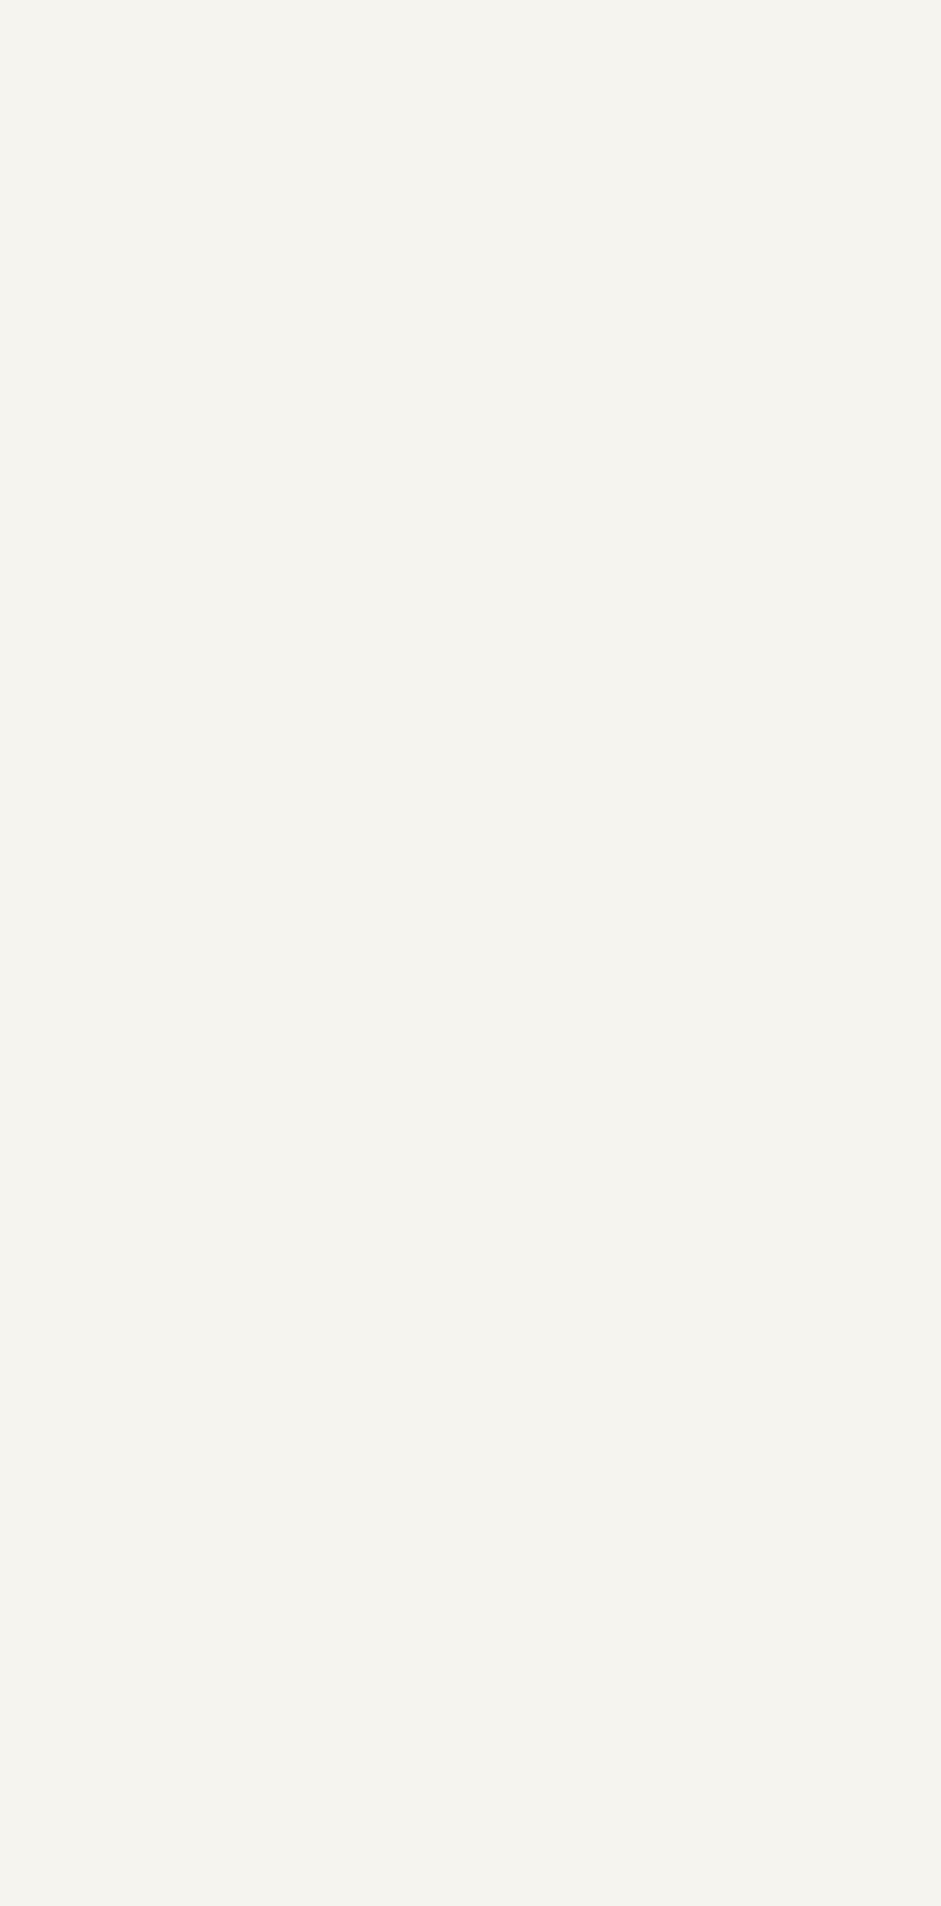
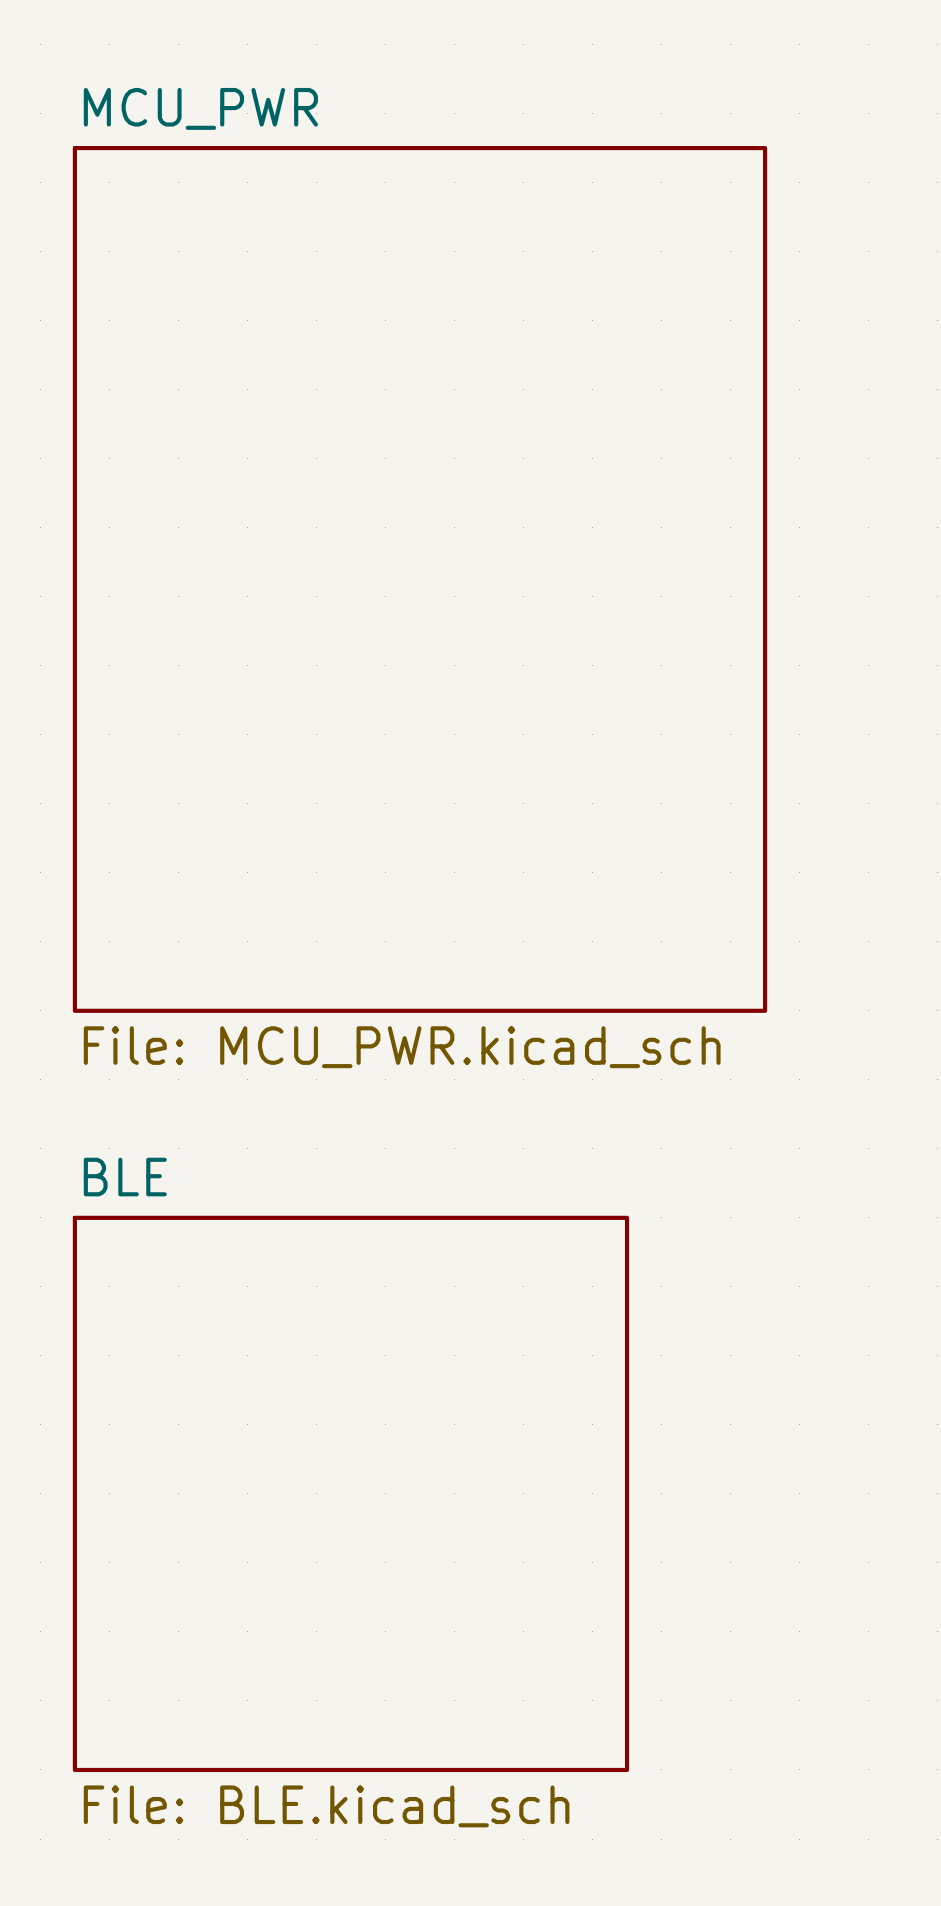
sheet MCU_PWR: none -> File: MCU_PWR.kicad_sch (419, 579)
sheet BLE: none -> File: BLE.kicad_sch (350, 1493)

